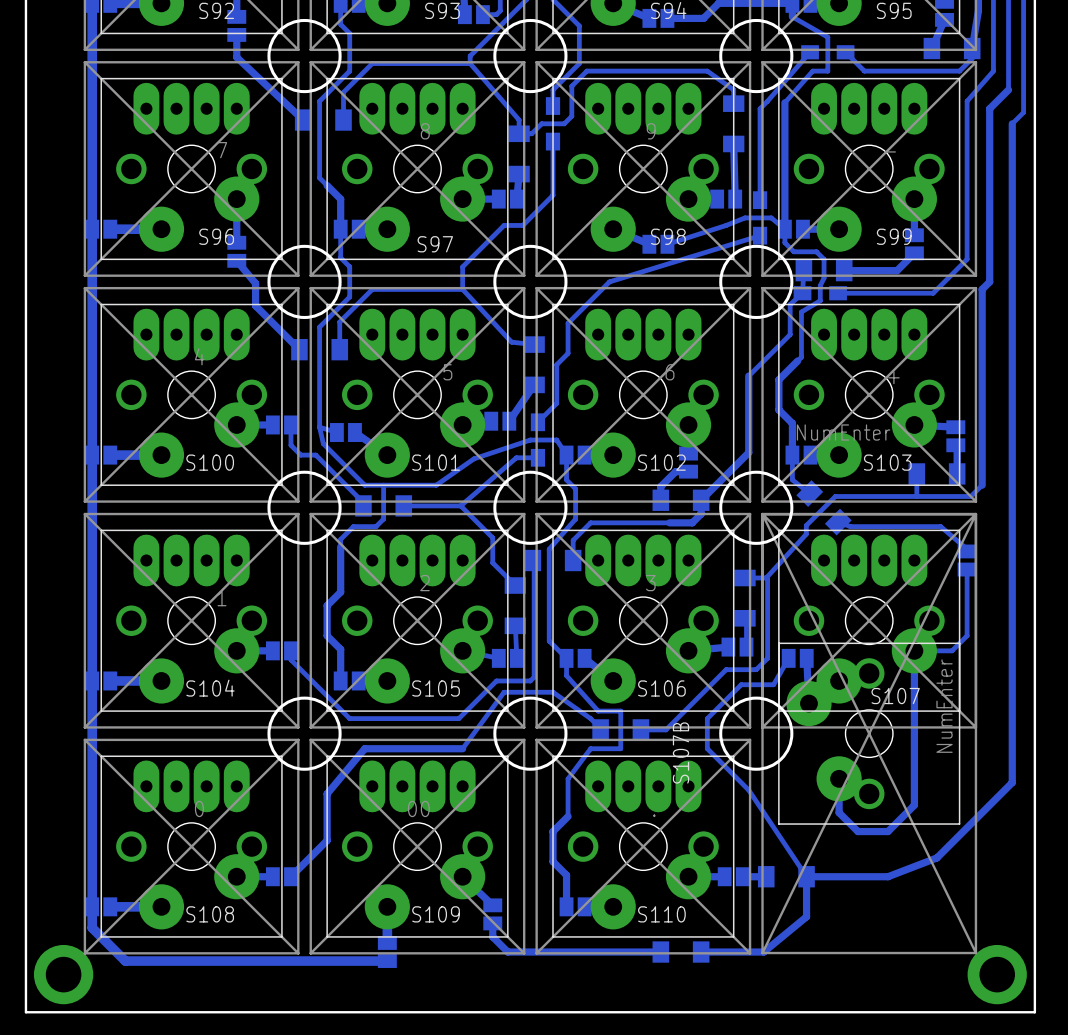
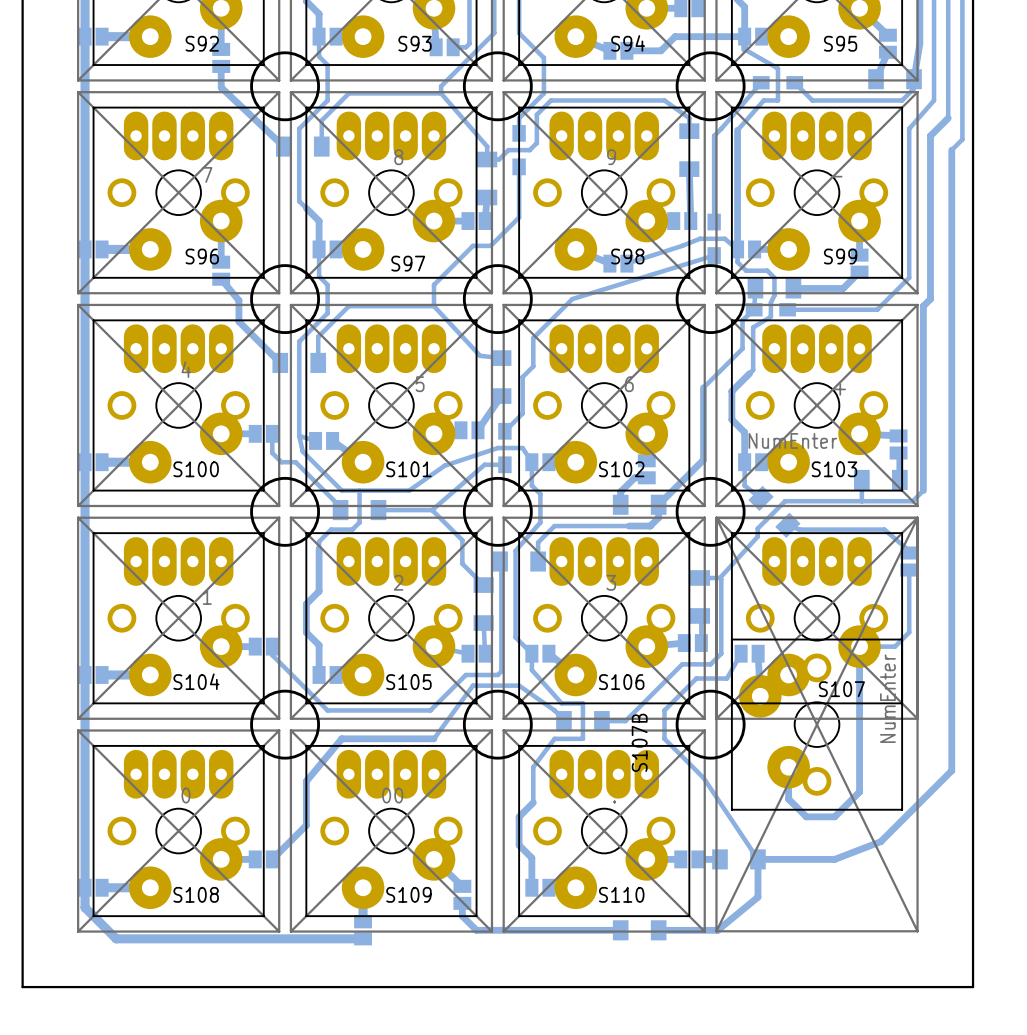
via: (63, 974) -> none
via: (997, 974) -> none

